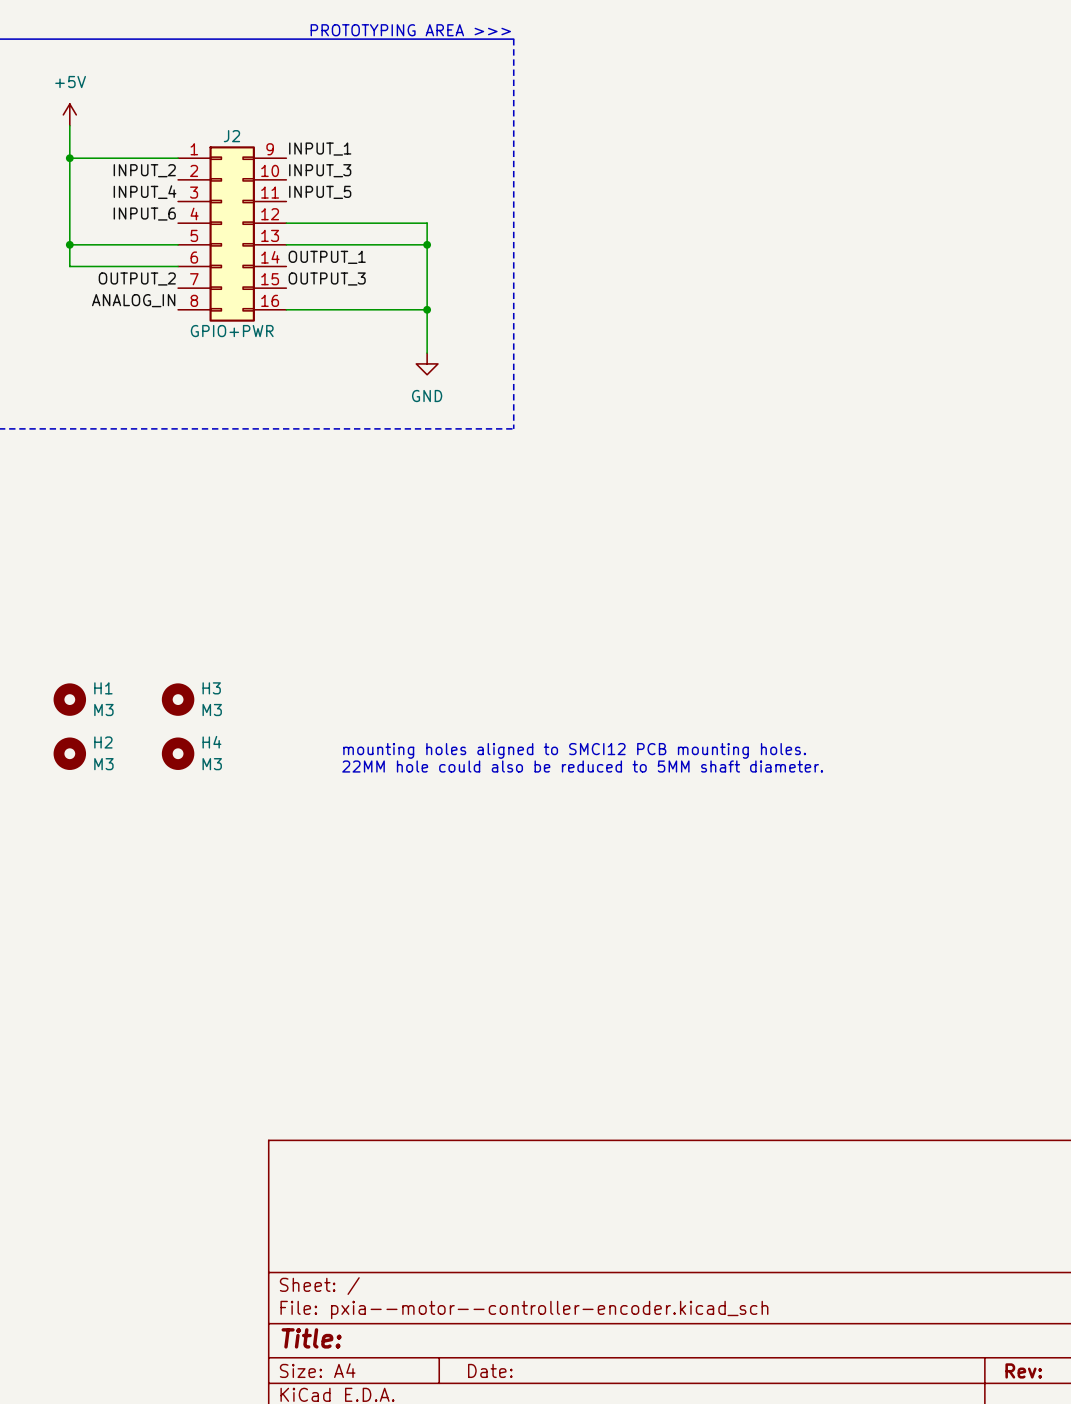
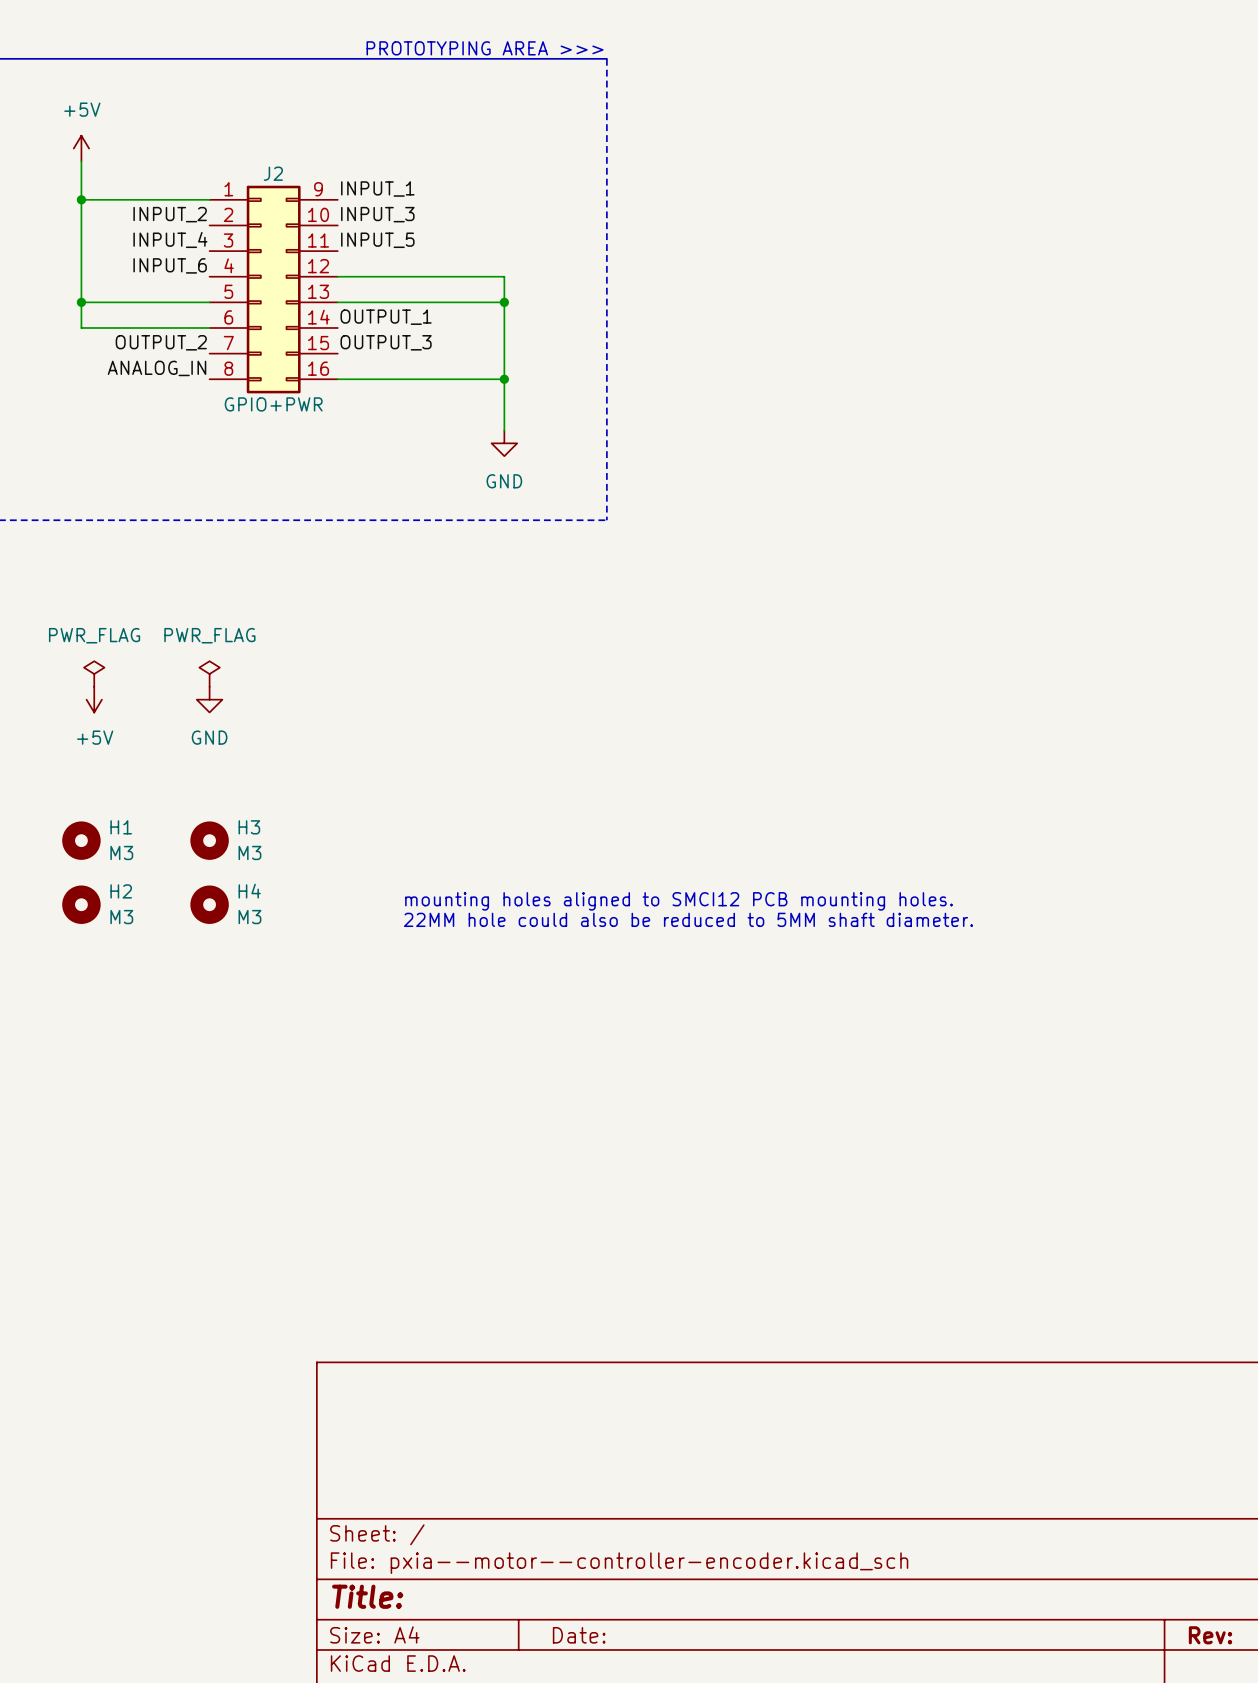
power symbol: none -> PWR_FLAG (94, 674)
power symbol: none -> PWR_FLAG (209, 674)
power symbol: none -> +5V (94, 699)
power symbol: none -> GND (209, 699)

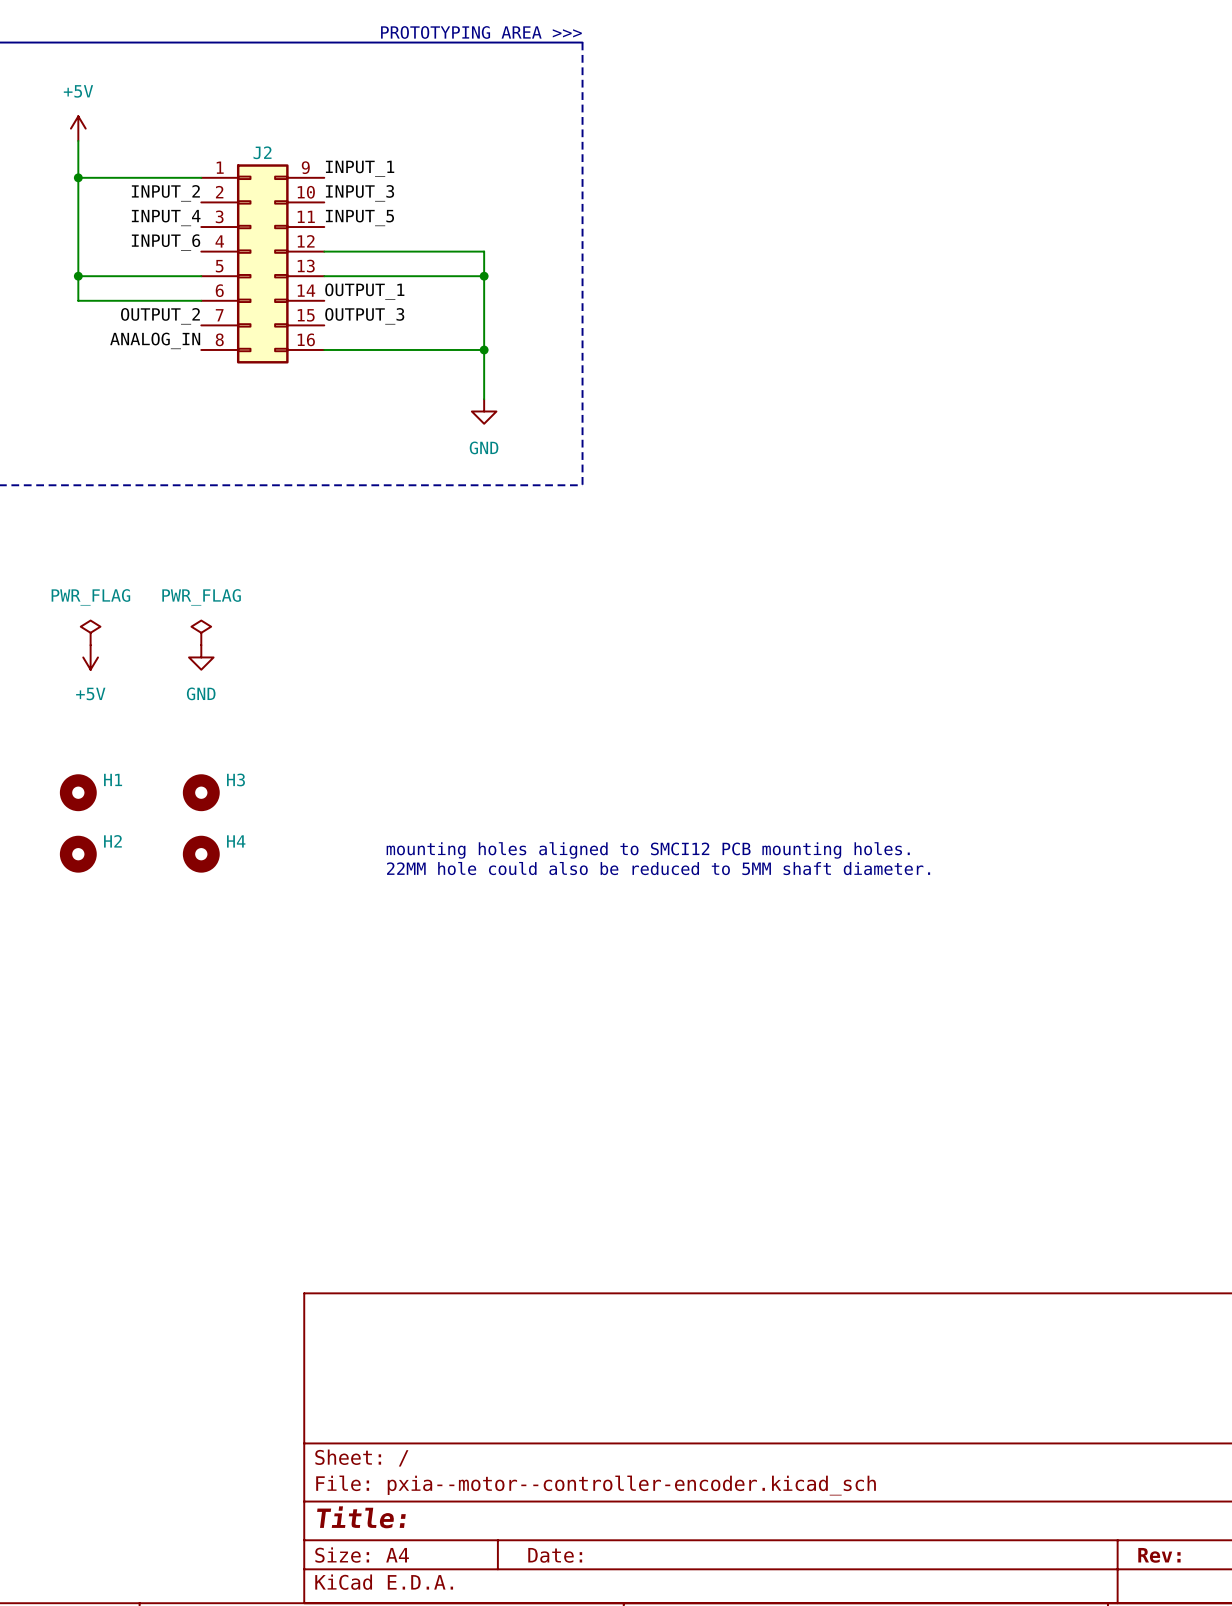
J2 value: GPIO+PWR (273, 404) -> none
H1 value: M3 (121, 852) -> none
H3 value: M3 (249, 852) -> none
H2 value: M3 (121, 917) -> none
H4 value: M3 (249, 917) -> none

